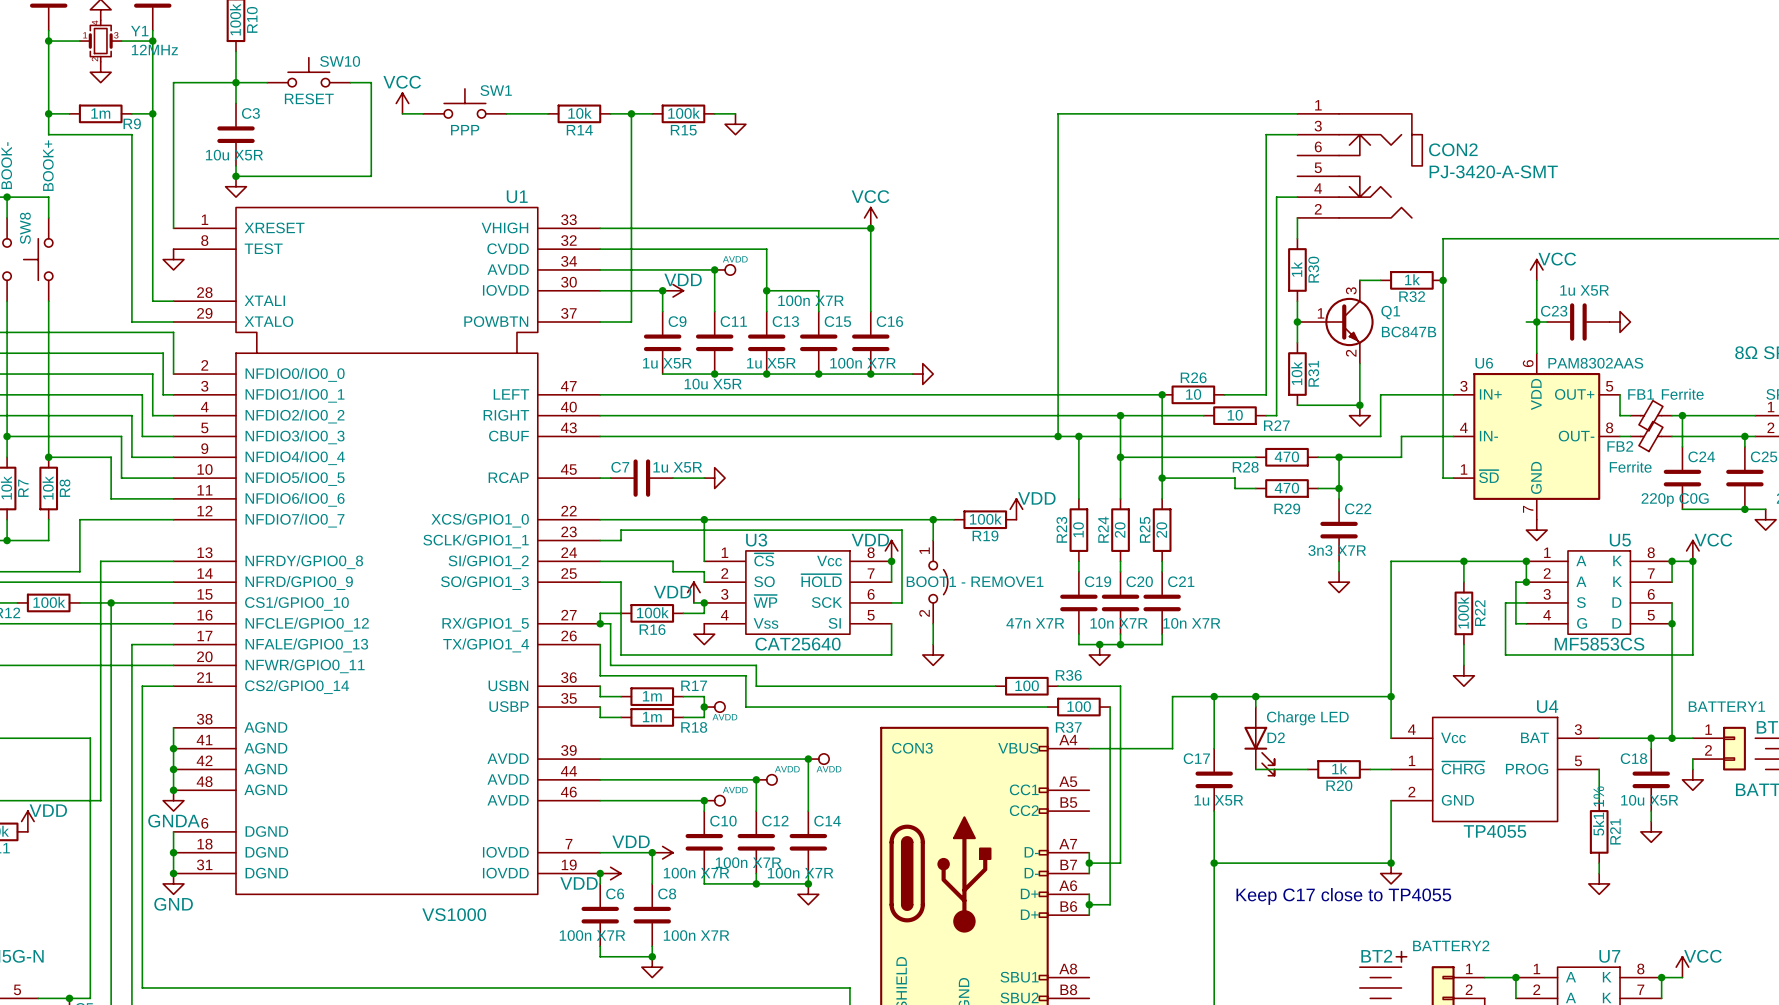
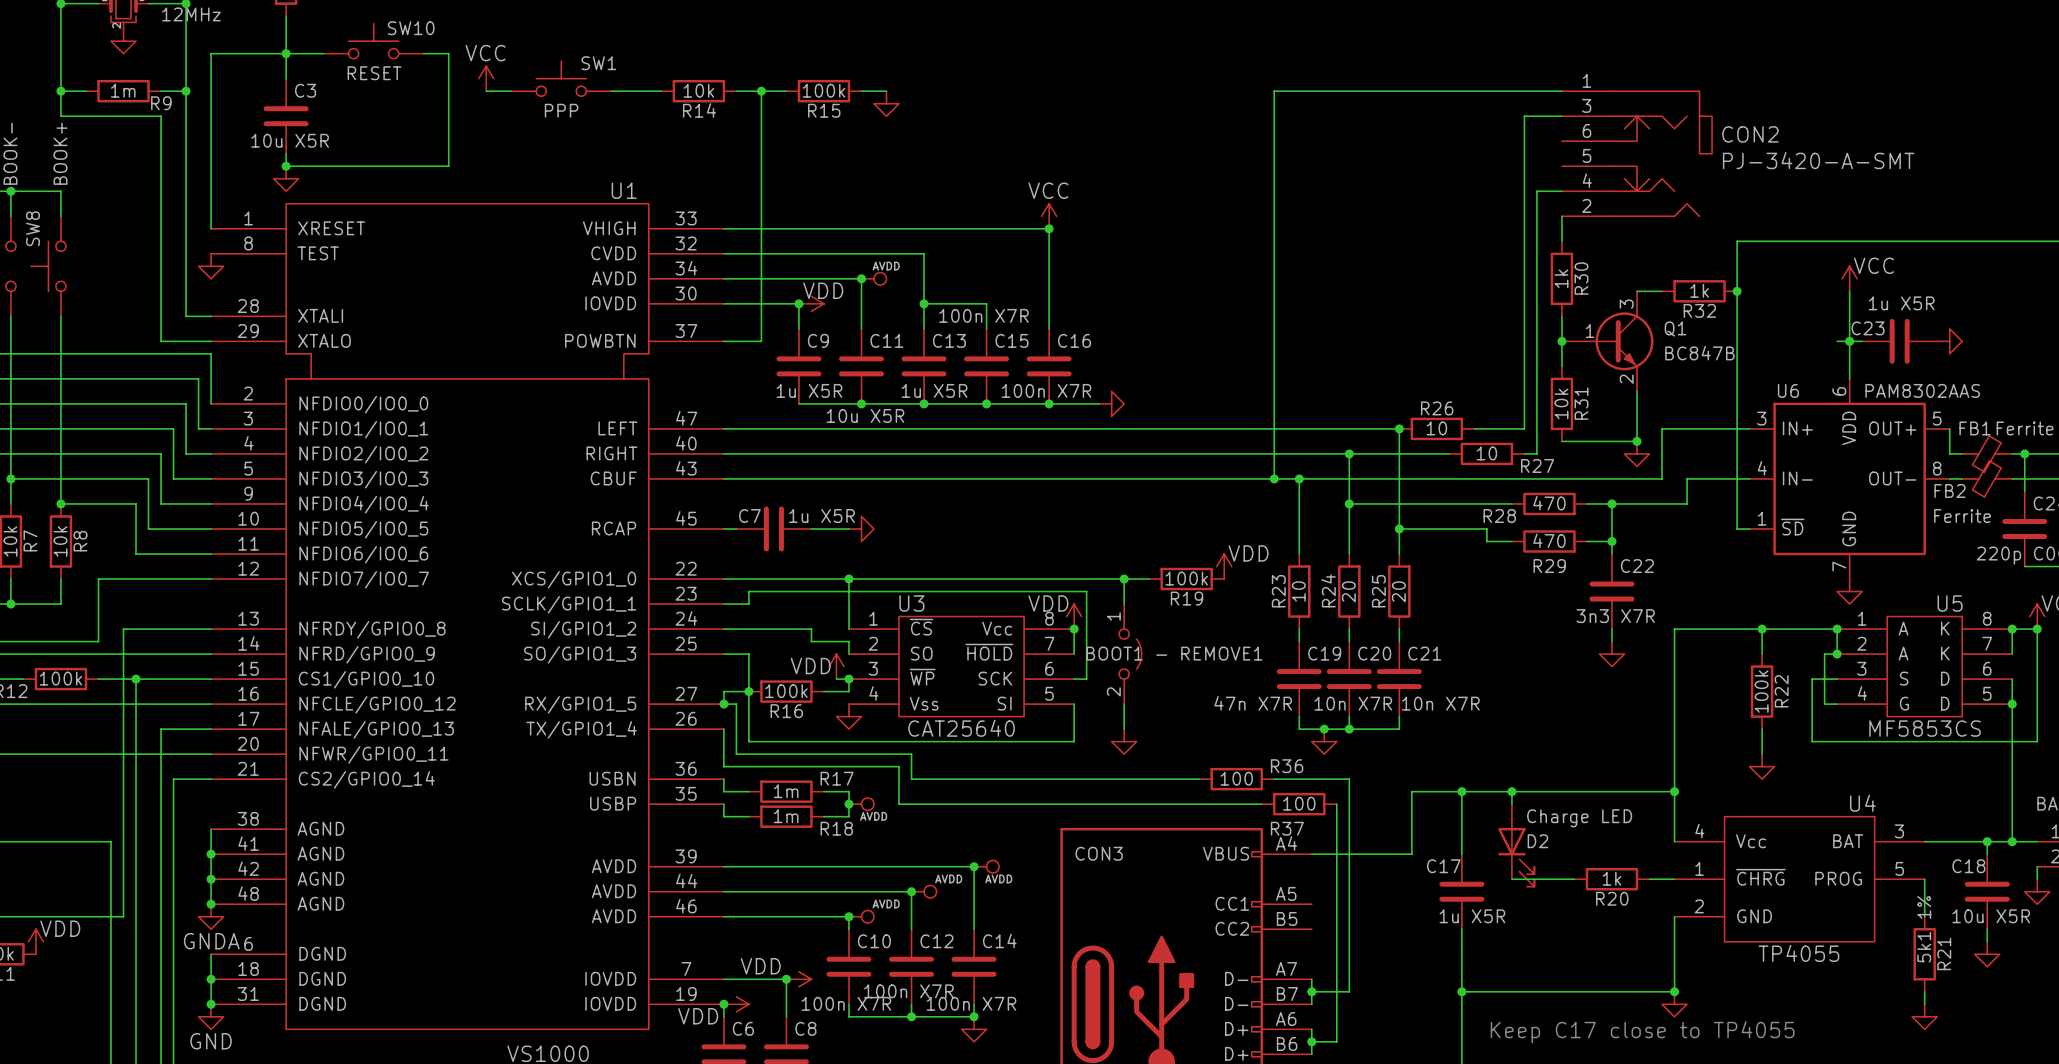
junction: none -> (748, 691)

